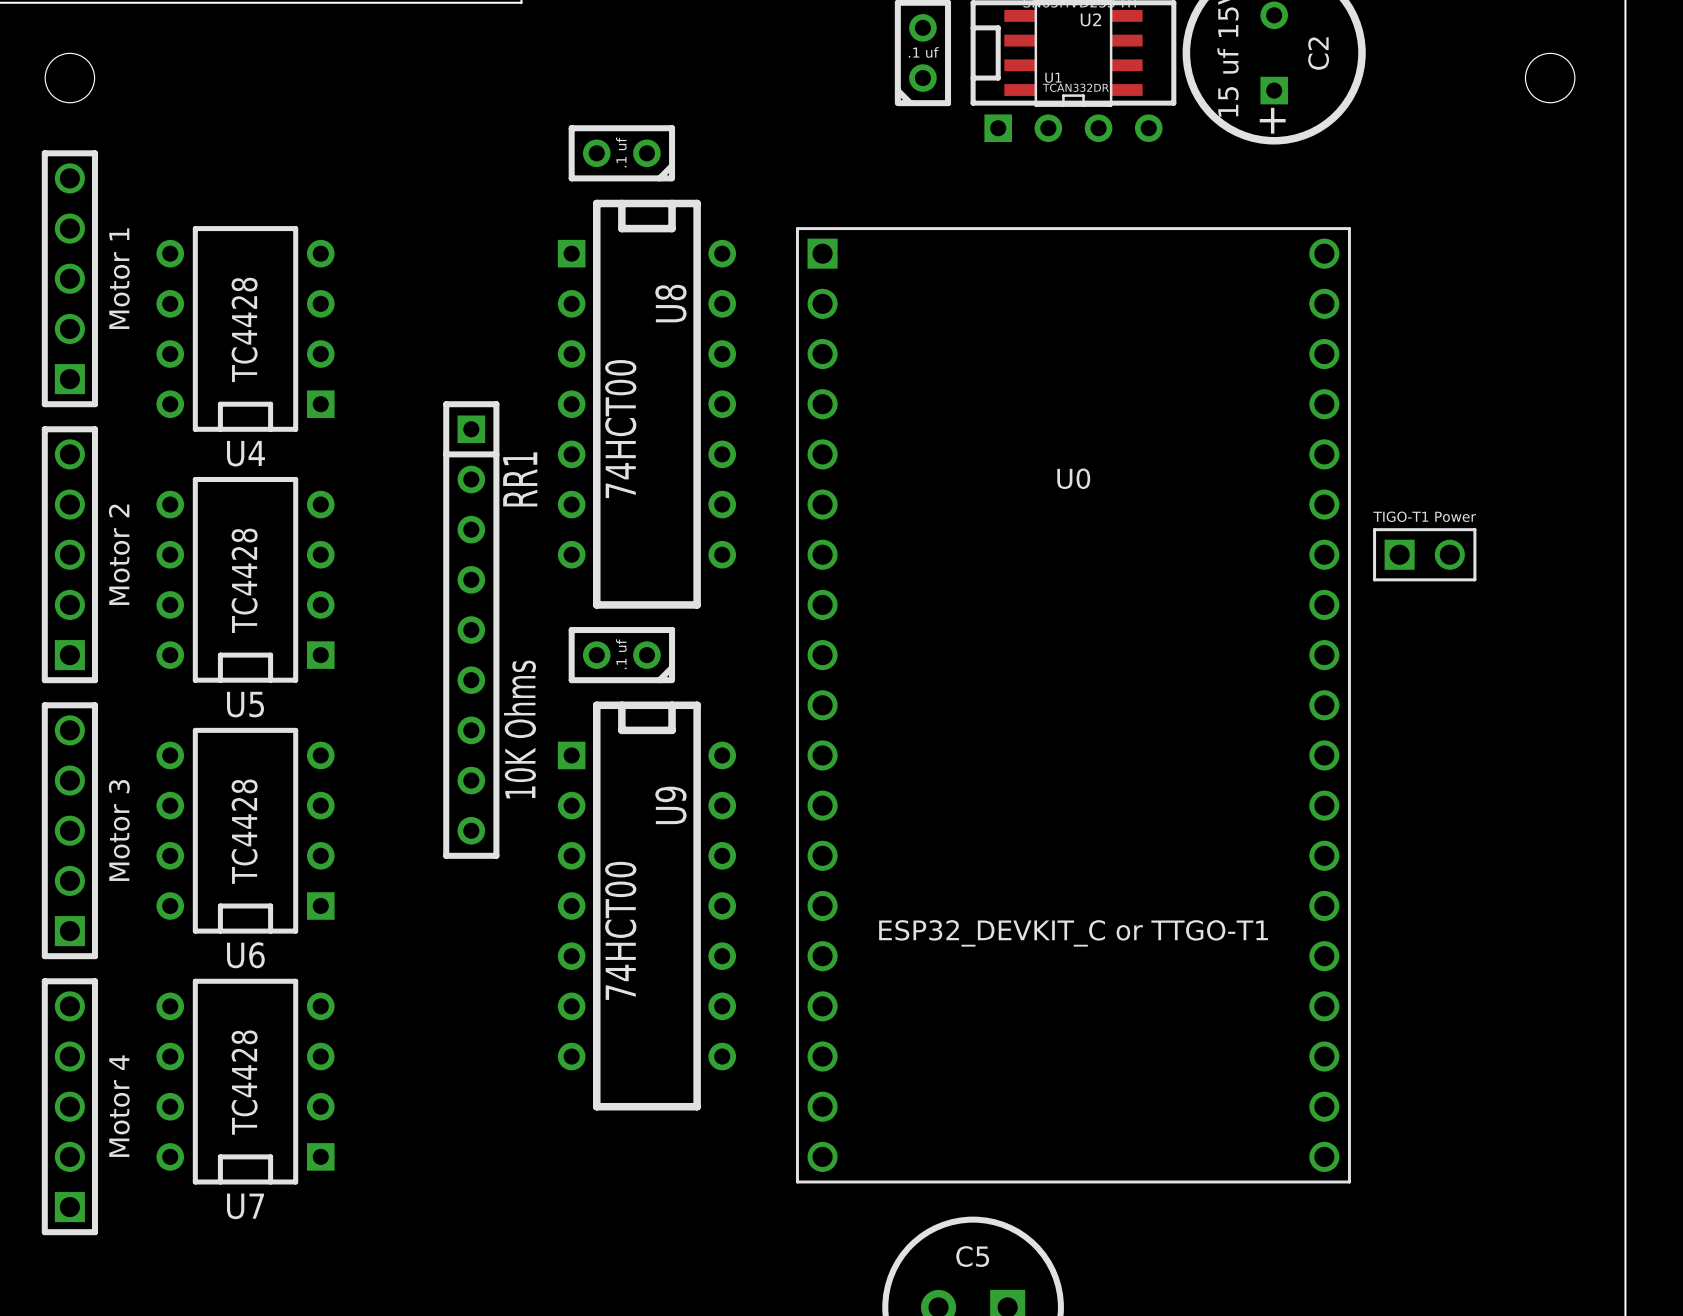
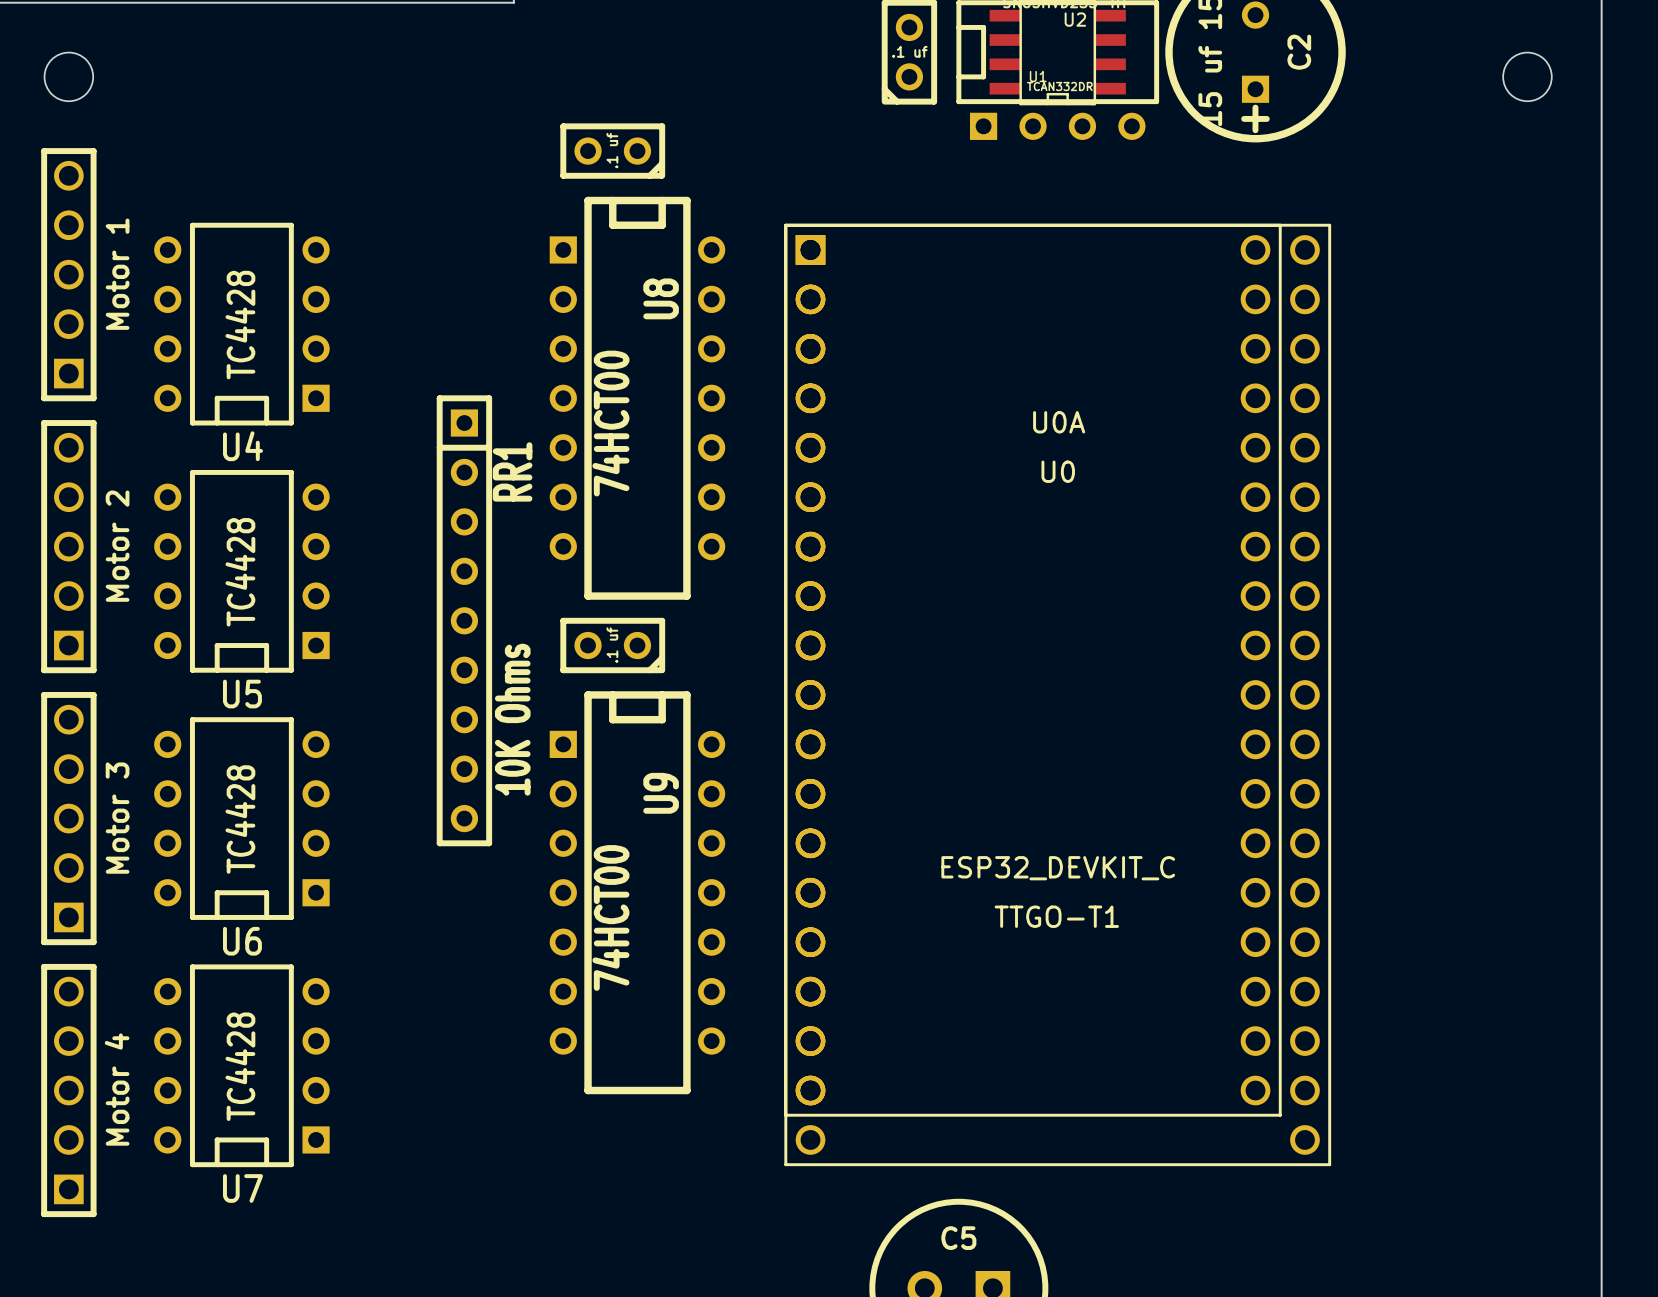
part: TIGO-T1 Power (1424, 554) -> none
U0A: none -> TTGO-T1 (1033, 670)
U0 value: ESP32_DEVKIT_C or TTGO-T1 (1073, 933) -> ESP32_DEVKIT_C (1058, 868)

